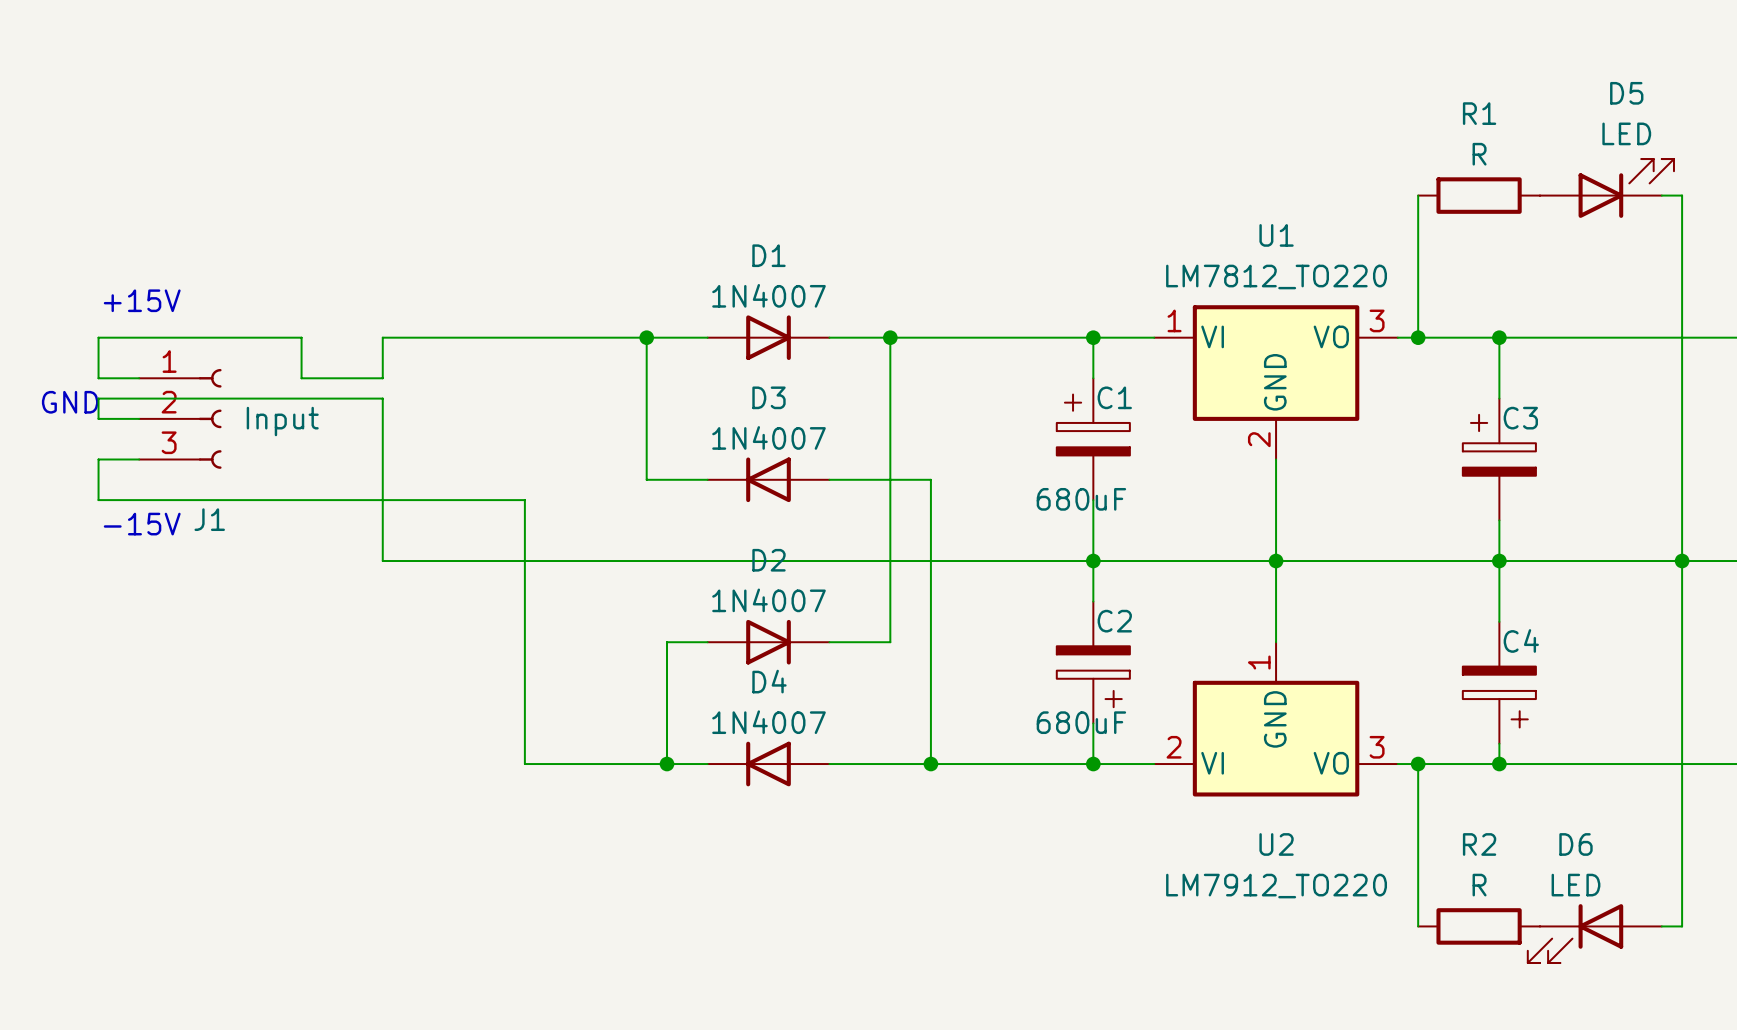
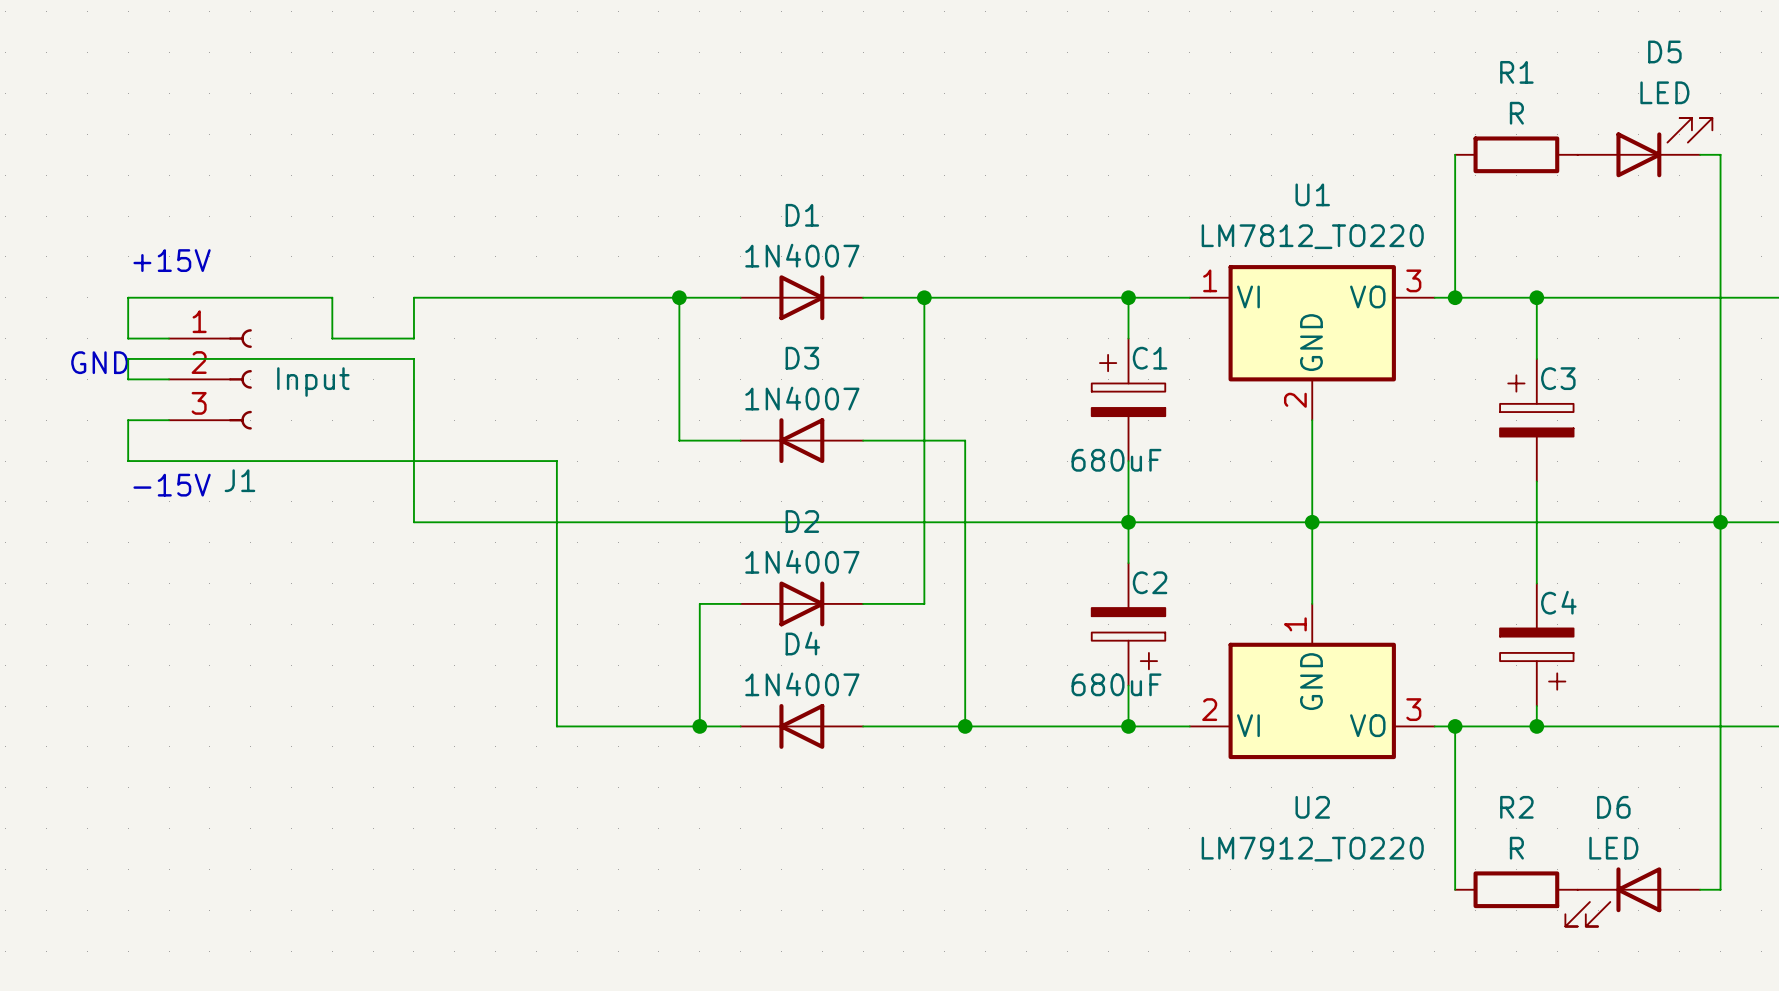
junction: (1499, 561) -> none

